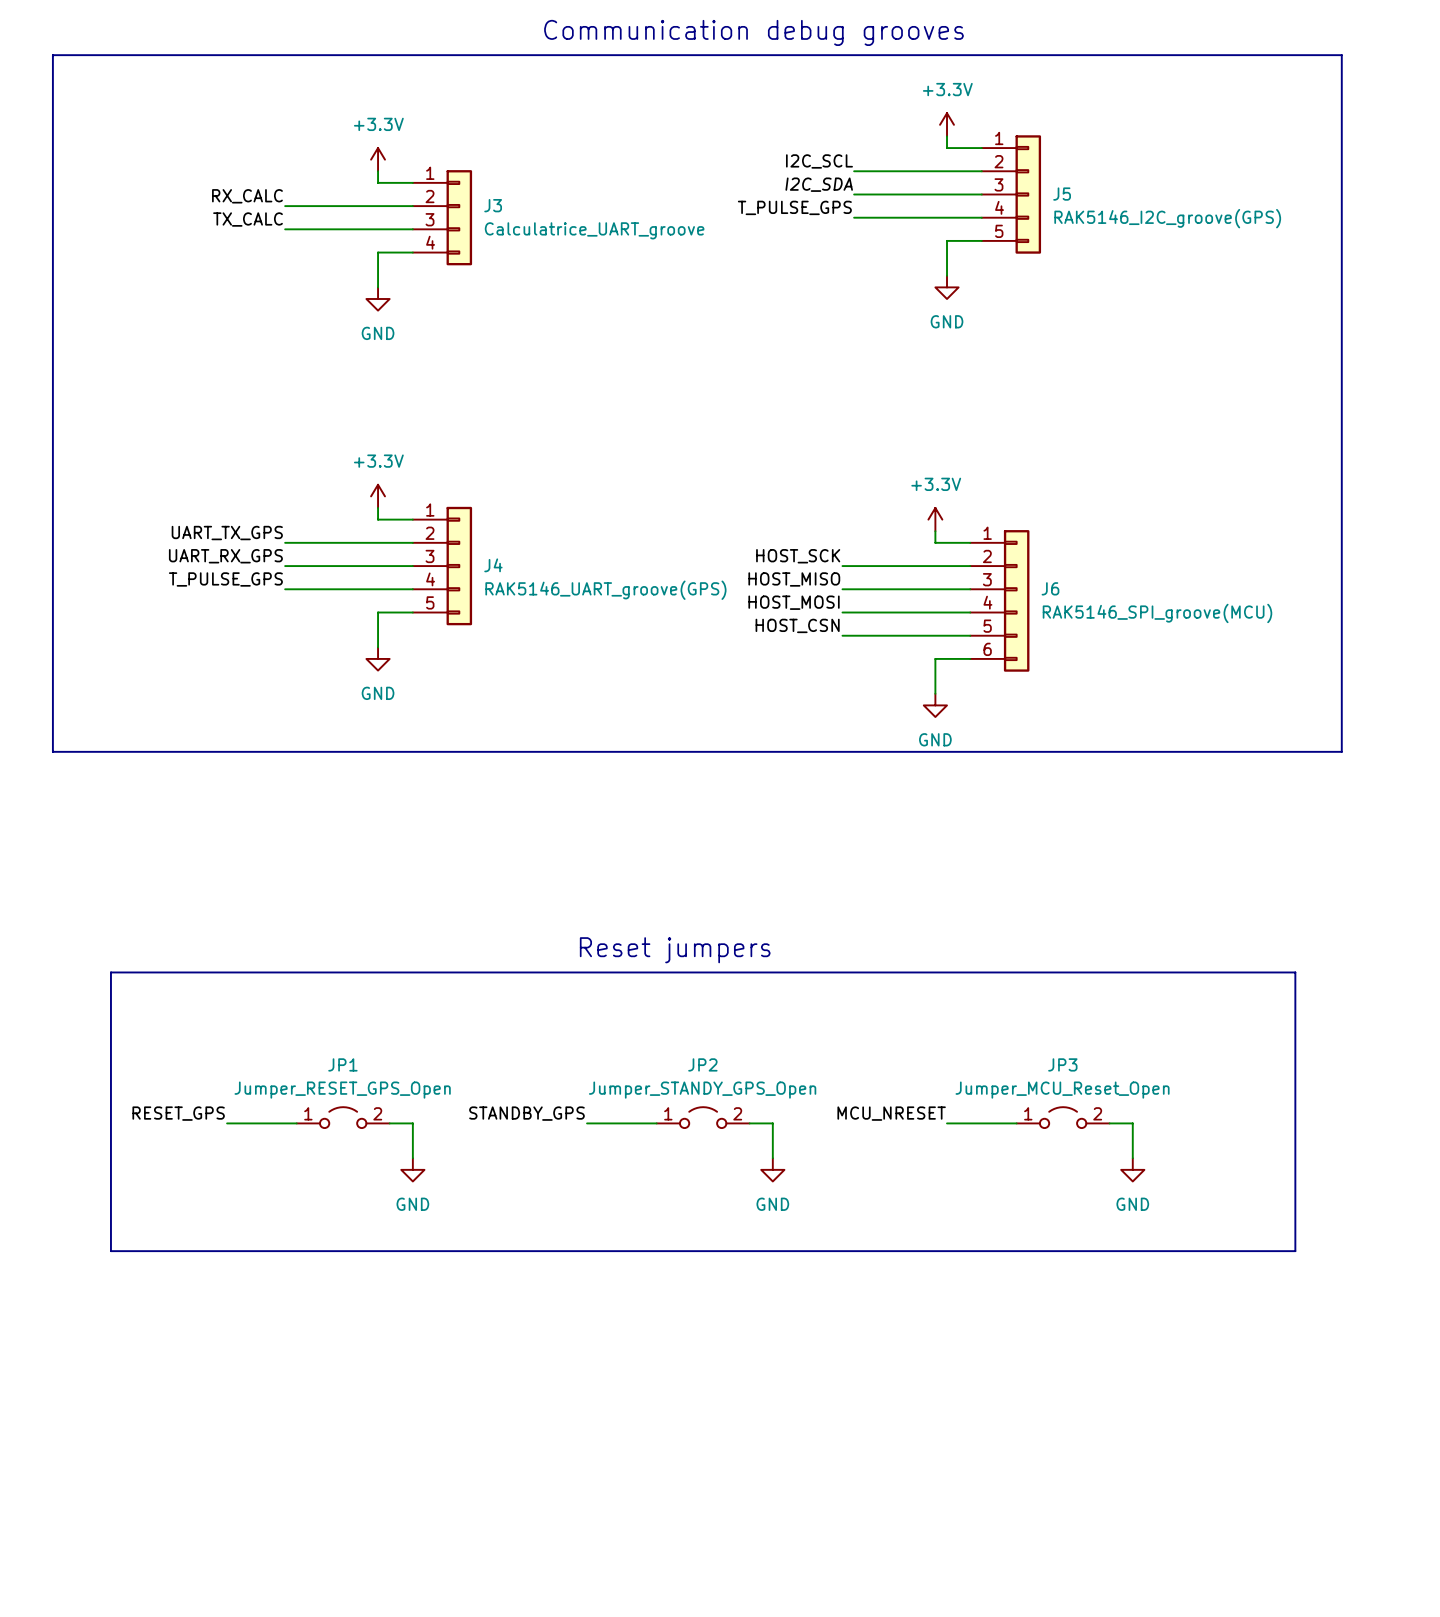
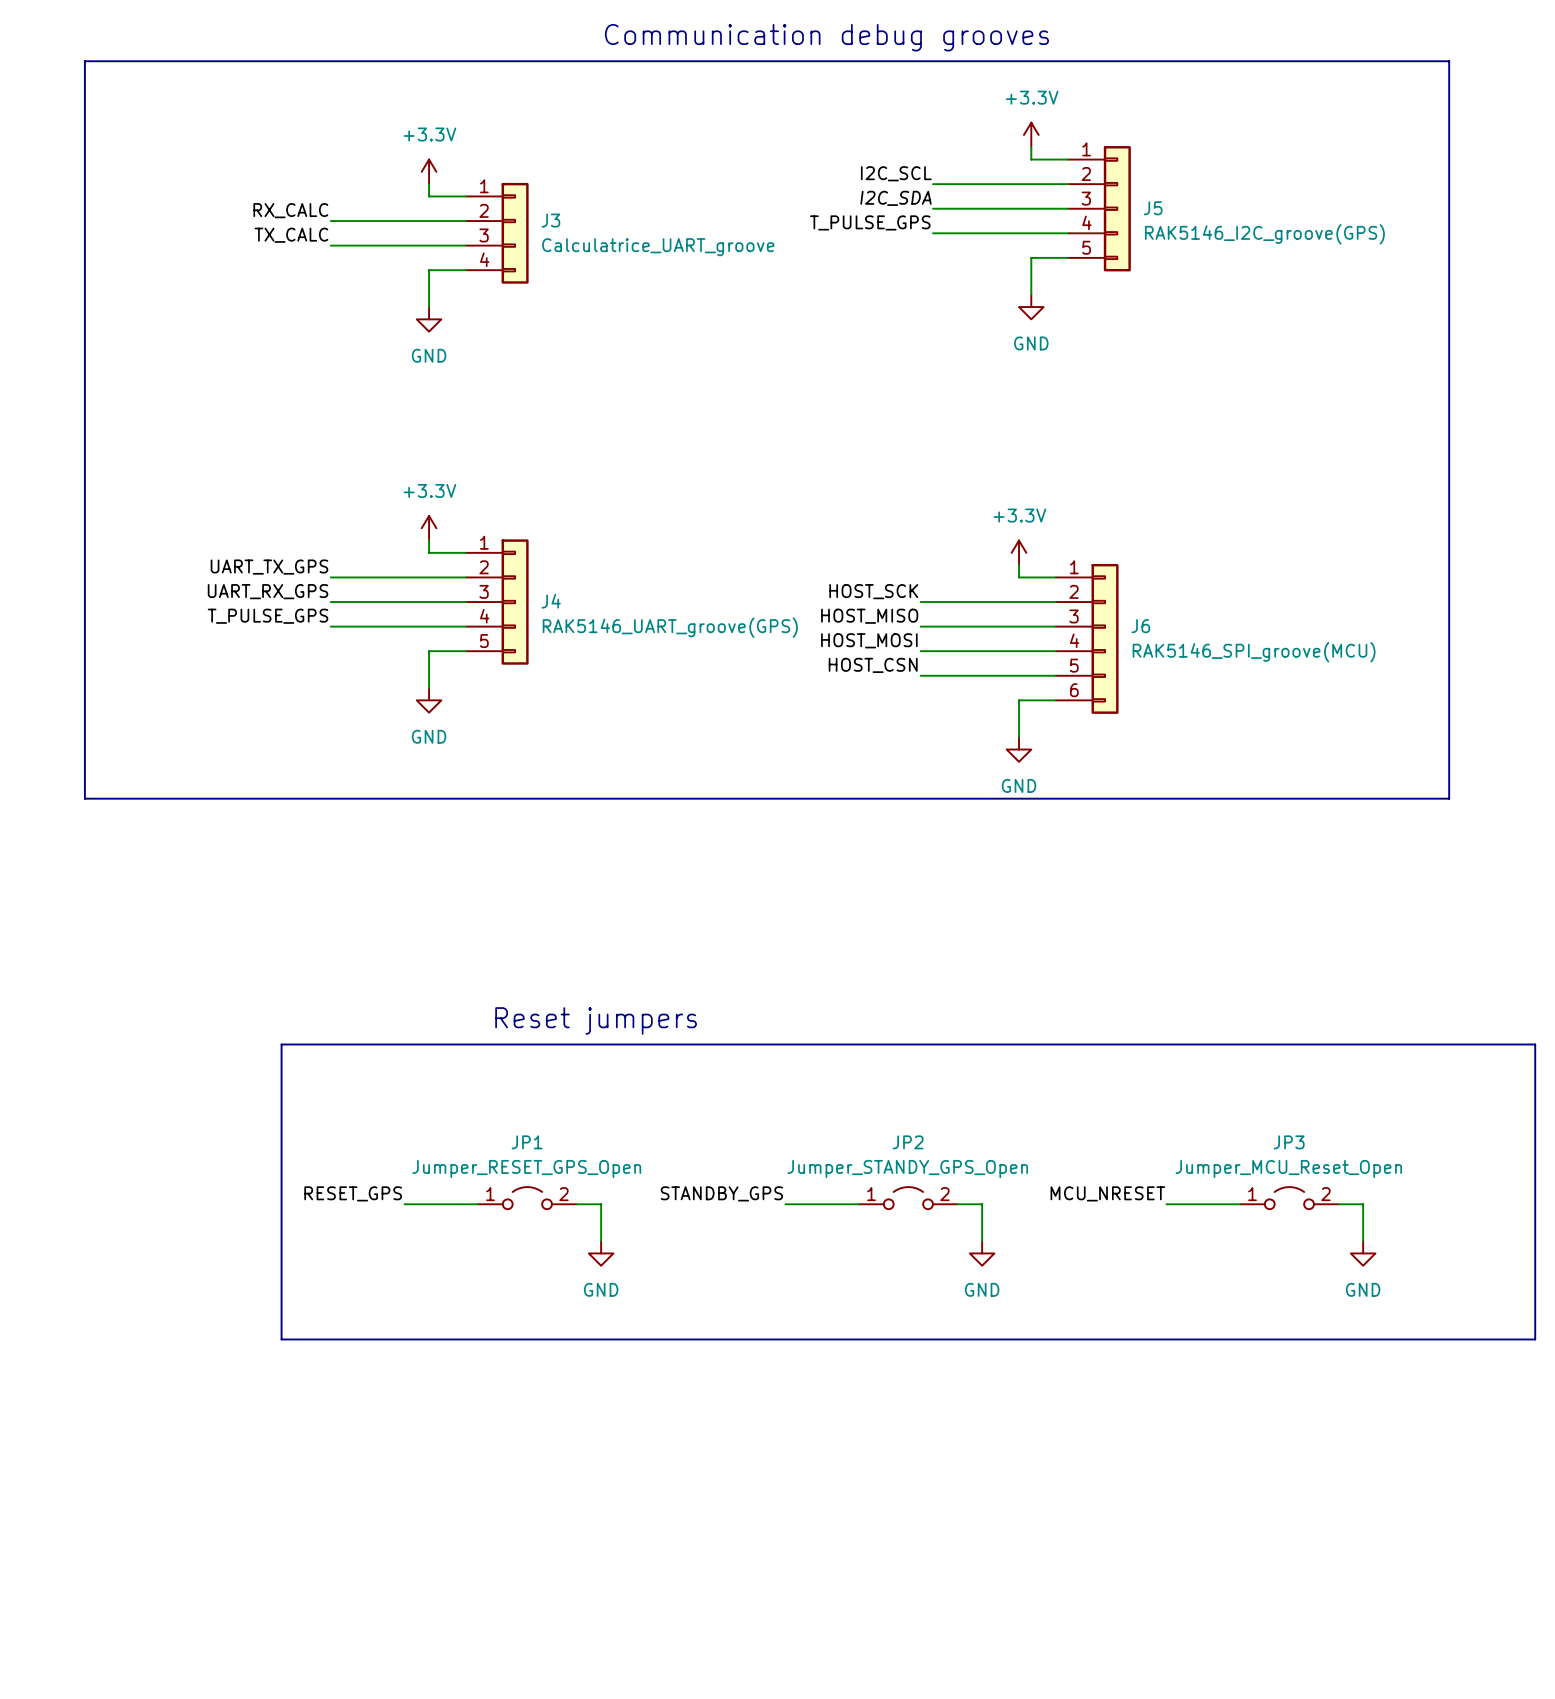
text position: Reset jumpers (675, 950) -> Reset jumpers (596, 1020)
line: (110, 972) (1295, 972) (1295, 1251) (110, 1251) (110, 972) -> (281, 1044) (1535, 1044) (1535, 1339) (281, 1339) (281, 1044)
label position: RESET_GPS (178, 1113) -> RESET_GPS (353, 1193)
label position: STANDBY_GPS (526, 1113) -> STANDBY_GPS (721, 1193)
label position: MCU_NRESET (891, 1113) -> MCU_NRESET (1107, 1193)
JP1 position: (343, 1117) -> (527, 1198)
JP2 position: (703, 1117) -> (908, 1198)
JP3 position: (1063, 1117) -> (1289, 1198)
wire: (227, 1123) (296, 1123) -> (404, 1204) (478, 1204)
wire: (389, 1123) (412, 1123) (412, 1158) -> (576, 1204) (601, 1204) (601, 1241)
wire: (587, 1123) (656, 1123) -> (785, 1204) (859, 1204)
wire: (749, 1123) (772, 1123) (772, 1158) -> (957, 1204) (982, 1204) (982, 1241)
wire: (947, 1123) (1016, 1123) -> (1166, 1204) (1240, 1204)
wire: (1109, 1123) (1132, 1123) (1132, 1158) -> (1338, 1204) (1363, 1204) (1363, 1241)
power symbol: GND (412, 1169) -> none
power symbol: GND (772, 1169) -> none
power symbol: GND (1132, 1169) -> none
power symbol: none -> GND (601, 1253)
power symbol: none -> GND (982, 1253)
power symbol: none -> GND (1363, 1253)

